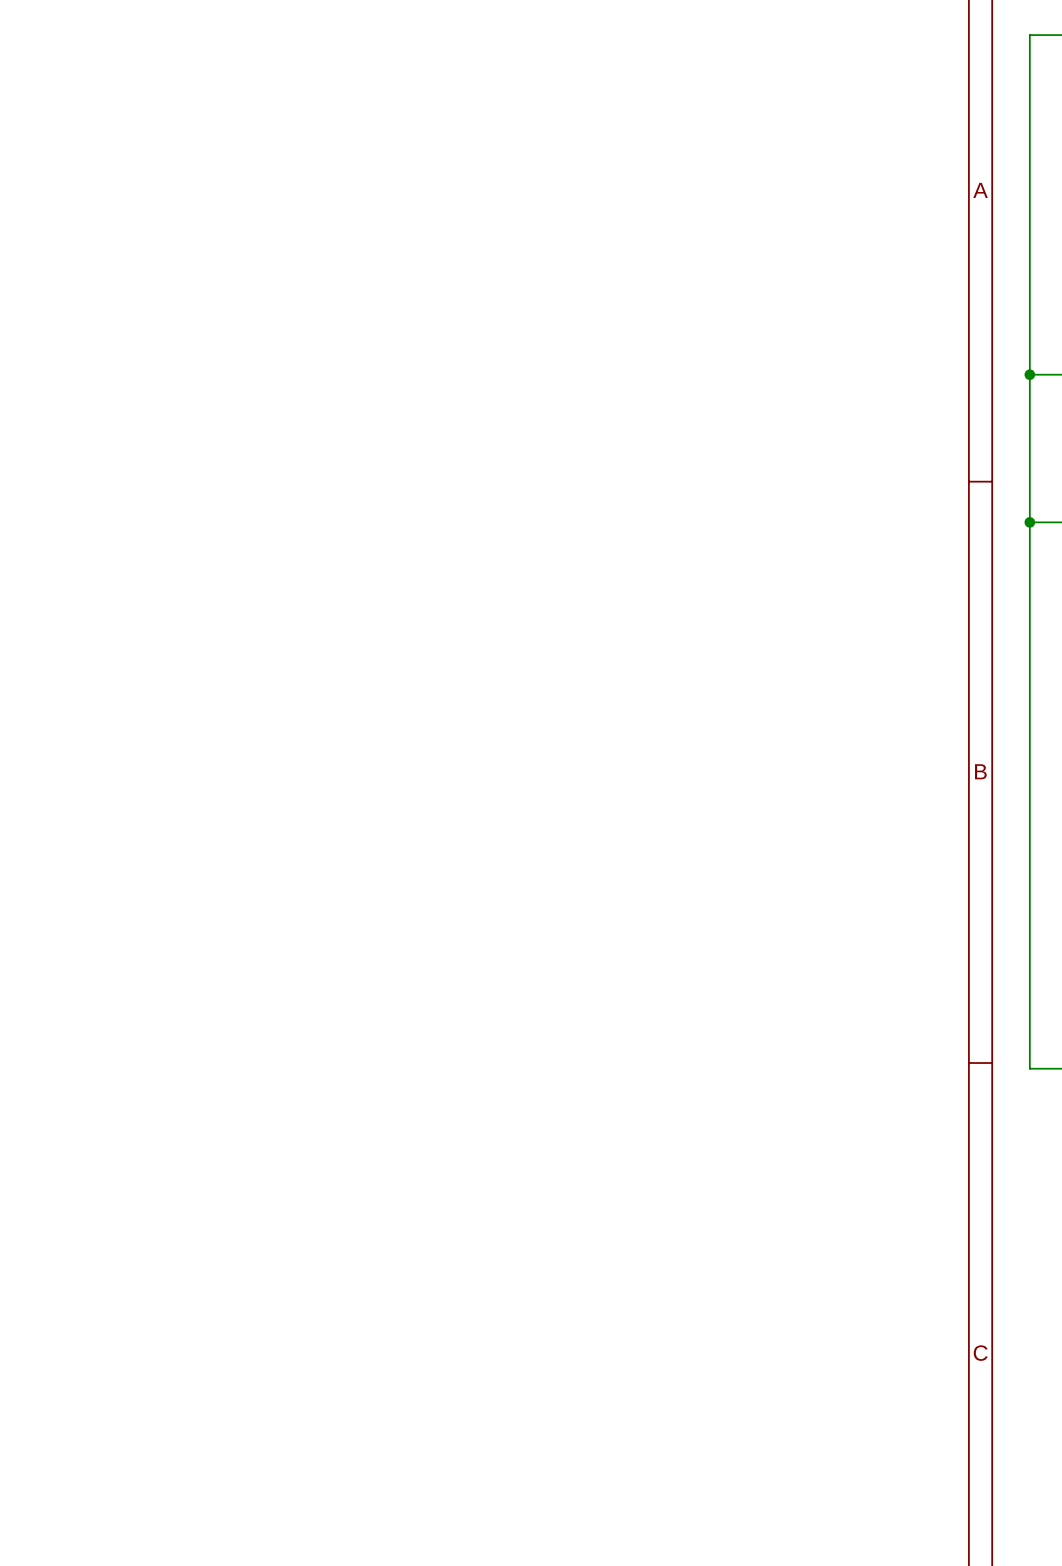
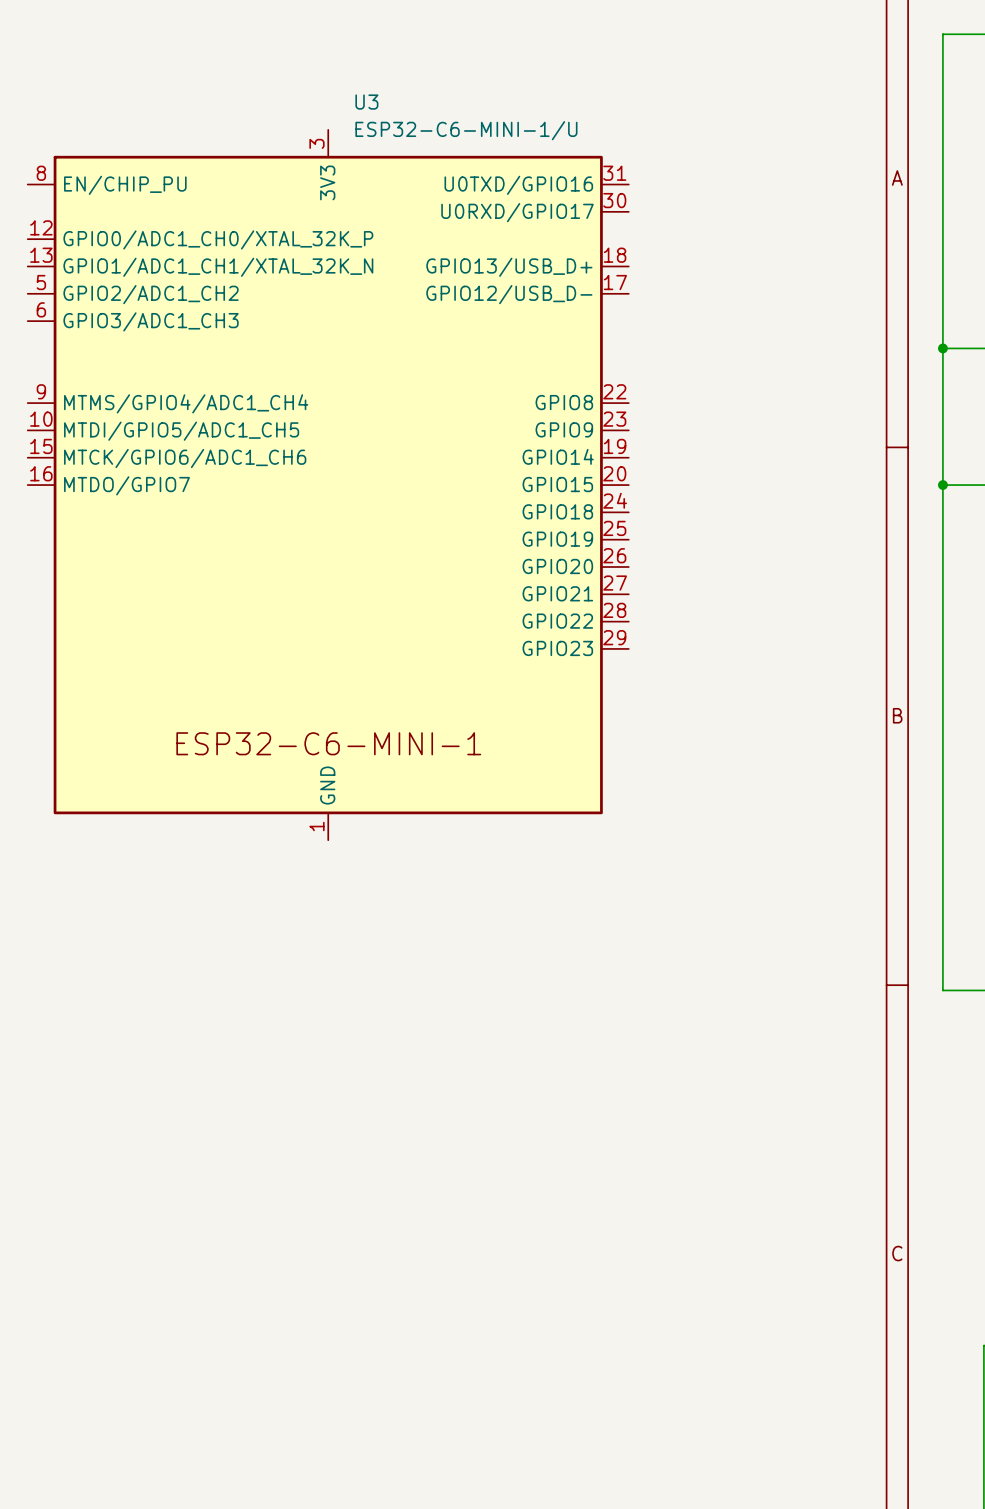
U3: none -> ESP32-C6-MINI-1/U (328, 485)

